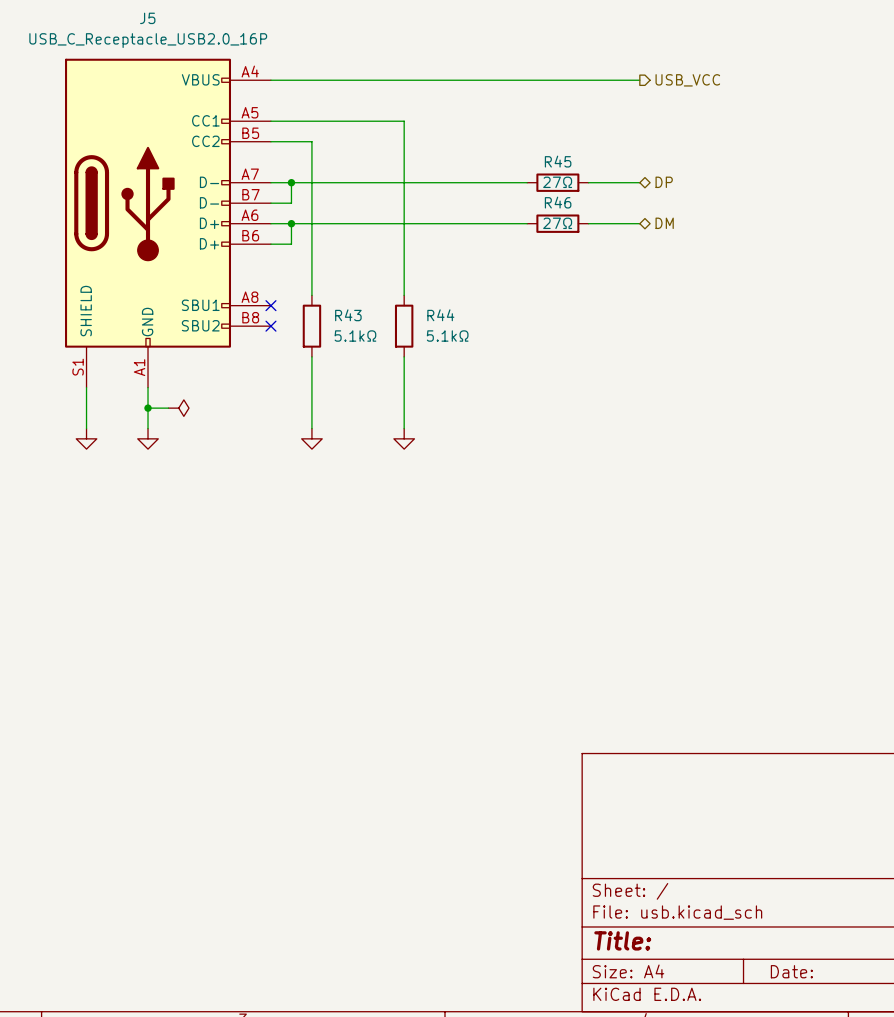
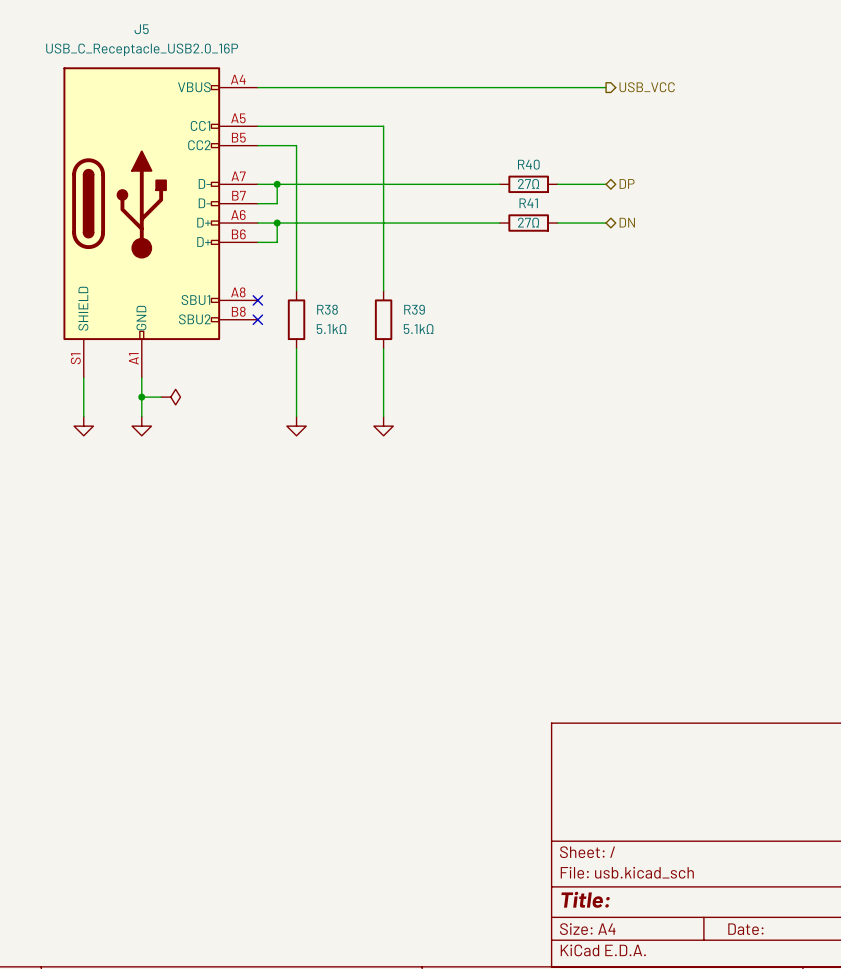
R45 name: R45 (558, 161) -> R40 (528, 164)
R46 name: R46 (558, 202) -> R41 (528, 203)
hierarchical label: DM (664, 223) -> DN (627, 222)
R43 name: R43 (348, 315) -> R38 (327, 309)
R44 name: R44 (440, 315) -> R39 (414, 309)

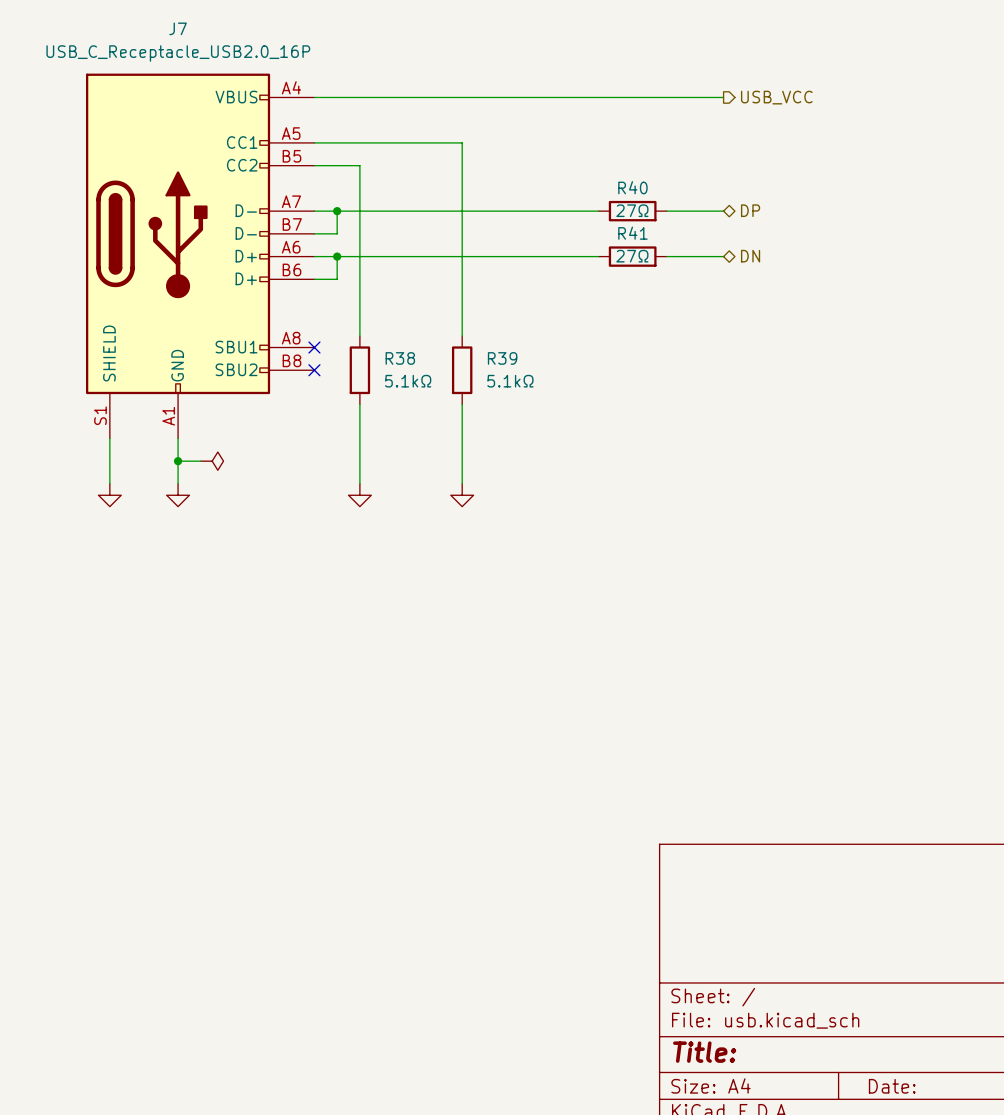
J5 name: J5 (141, 29) -> J7 (178, 28)

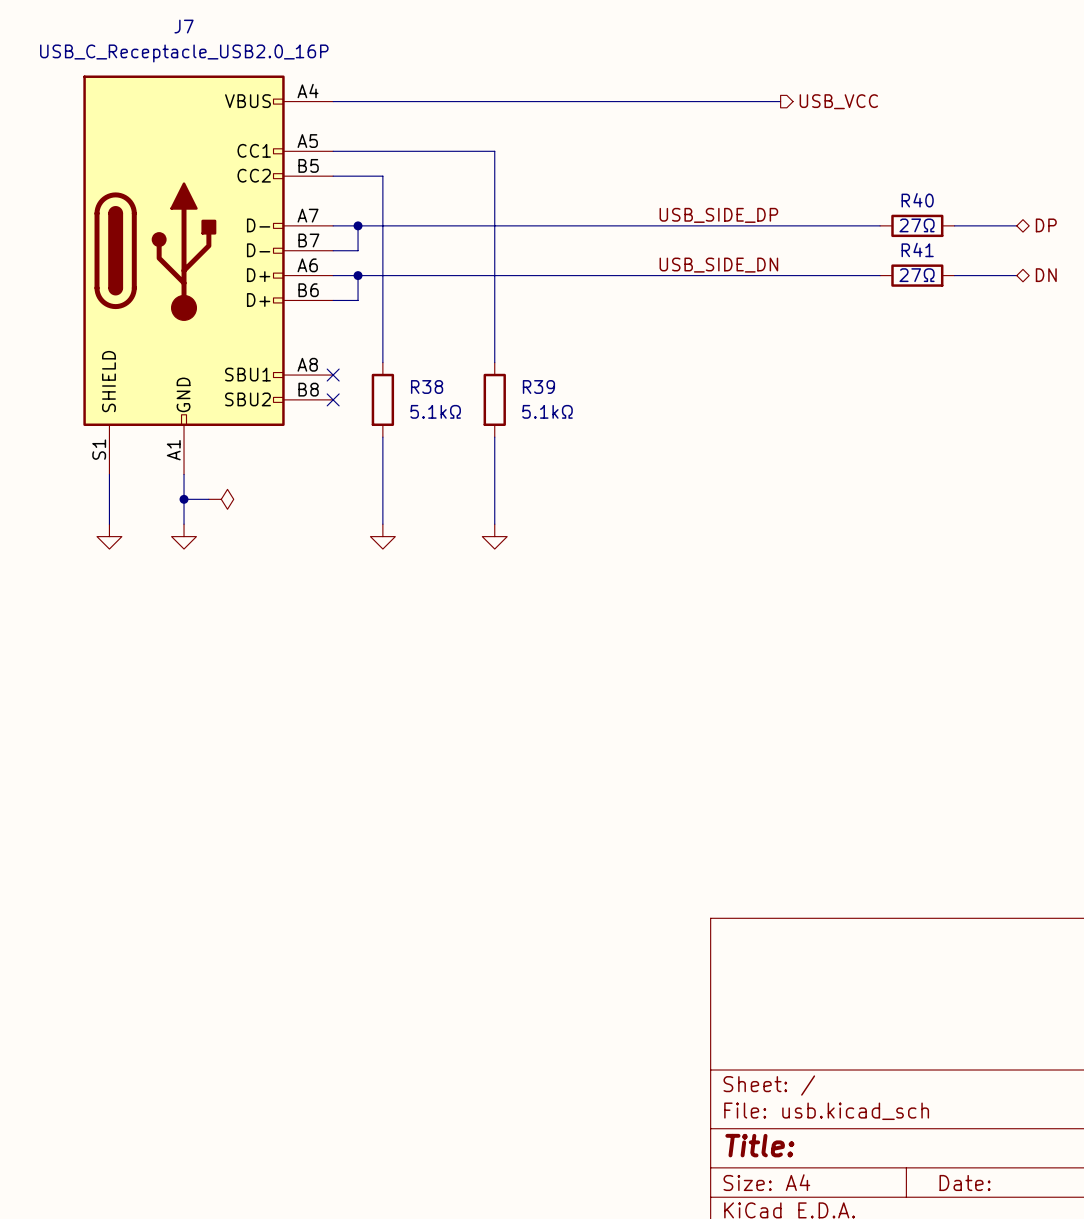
label: none -> USB_SIDE_DP (718, 215)
hierarchical label position: DP (750, 210) -> DP (1046, 225)
wire: none -> (643, 225) (718, 225)
R40 position: (632, 211) -> (917, 225)
wire: none -> (780, 225) (880, 225)
wire: none -> (954, 225) (1016, 225)
label: none -> USB_SIDE_DN (718, 265)
wire: none -> (643, 275) (718, 275)
R41 position: (632, 256) -> (917, 275)
wire: none -> (780, 275) (880, 275)
hierarchical label position: DN (750, 256) -> DN (1046, 275)
wire: none -> (954, 275) (1016, 275)

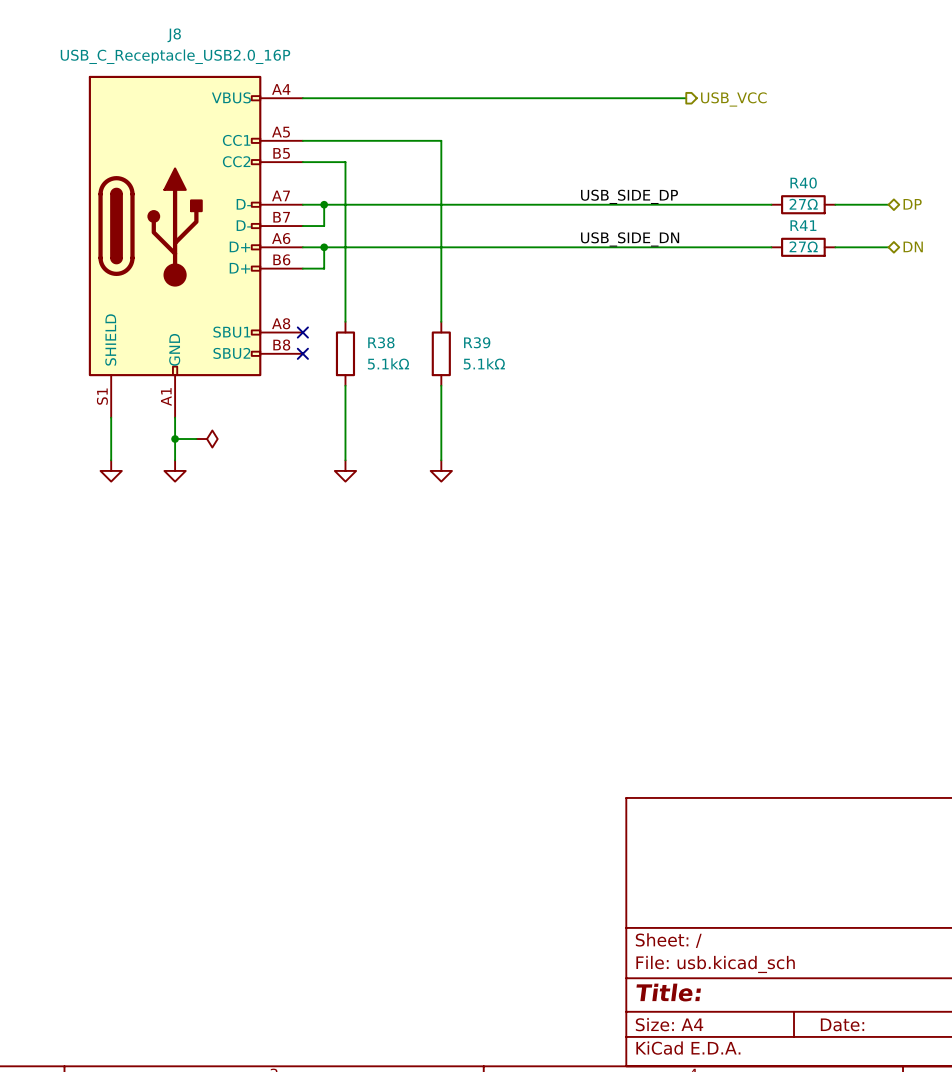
J7 name: J7 (184, 26) -> J8 (174, 35)

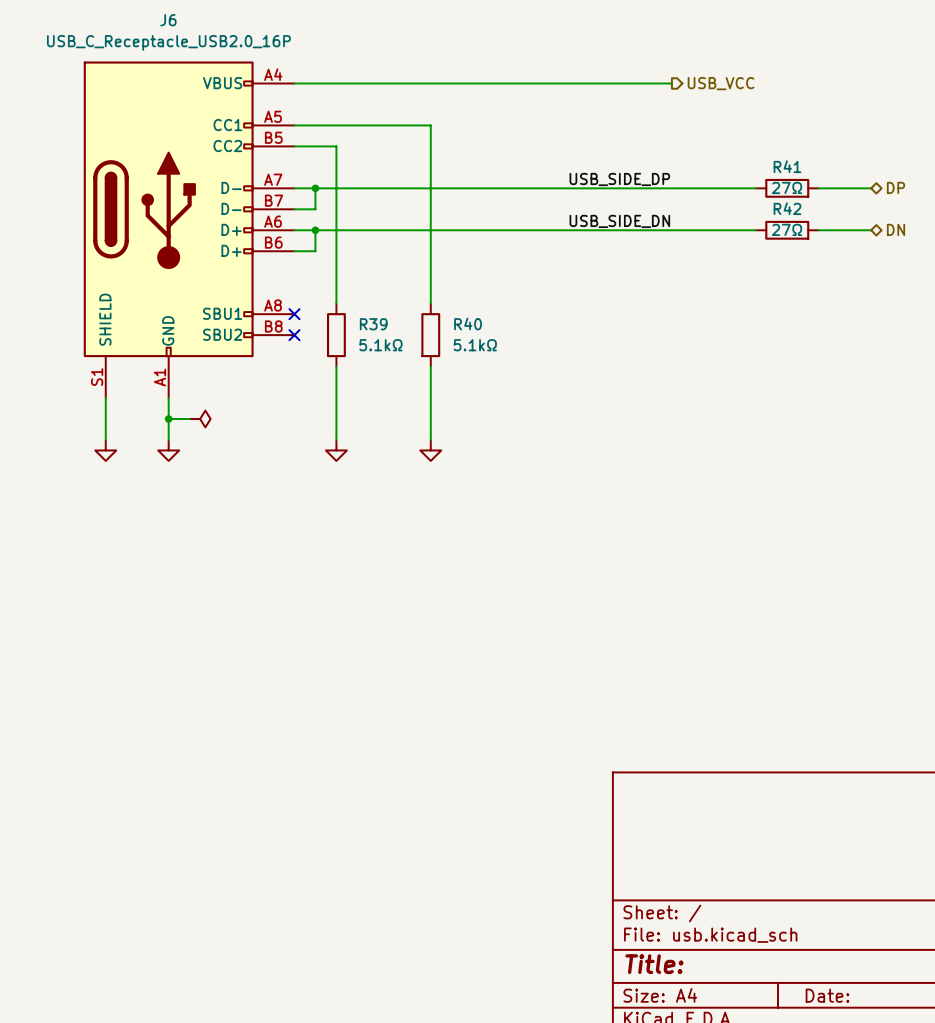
J8 name: J8 (174, 35) -> J6 (168, 20)
R40 name: R40 (803, 183) -> R41 (787, 166)
R41 name: R41 (803, 225) -> R42 (787, 208)
R38 name: R38 (381, 342) -> R39 (373, 324)
R39 name: R39 (477, 342) -> R40 (468, 324)

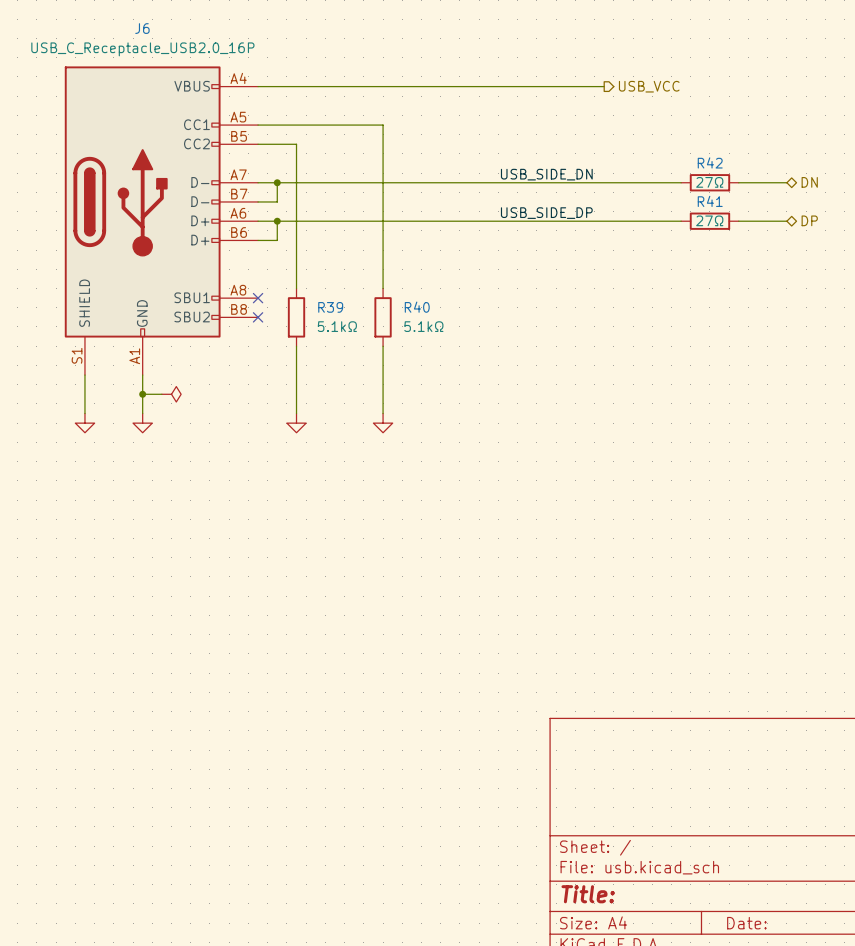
R41 name: R41 (787, 166) -> R42 (710, 162)
label position: USB_SIDE_DP (619, 179) -> USB_SIDE_DP (546, 213)
hierarchical label: DP (896, 187) -> DN (809, 182)
R42 name: R42 (787, 208) -> R41 (710, 201)
label position: USB_SIDE_DN (619, 221) -> USB_SIDE_DN (546, 174)
hierarchical label: DN (896, 229) -> DP (809, 220)

